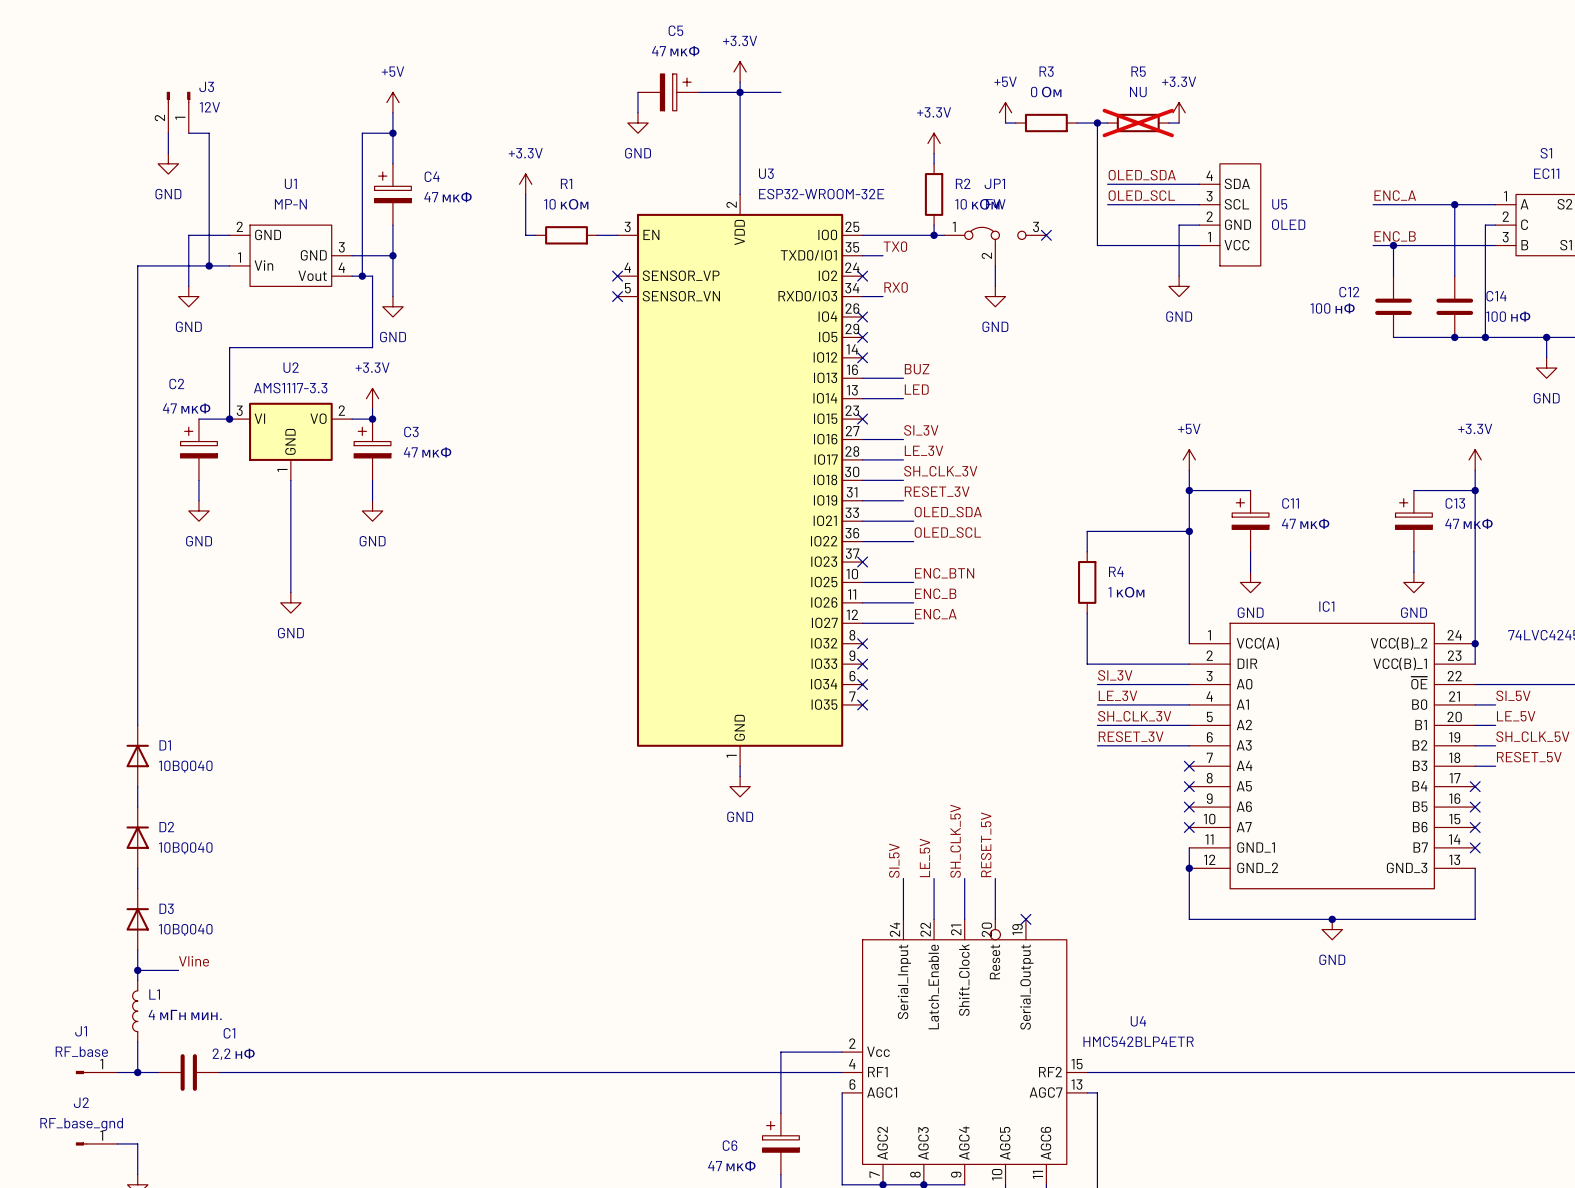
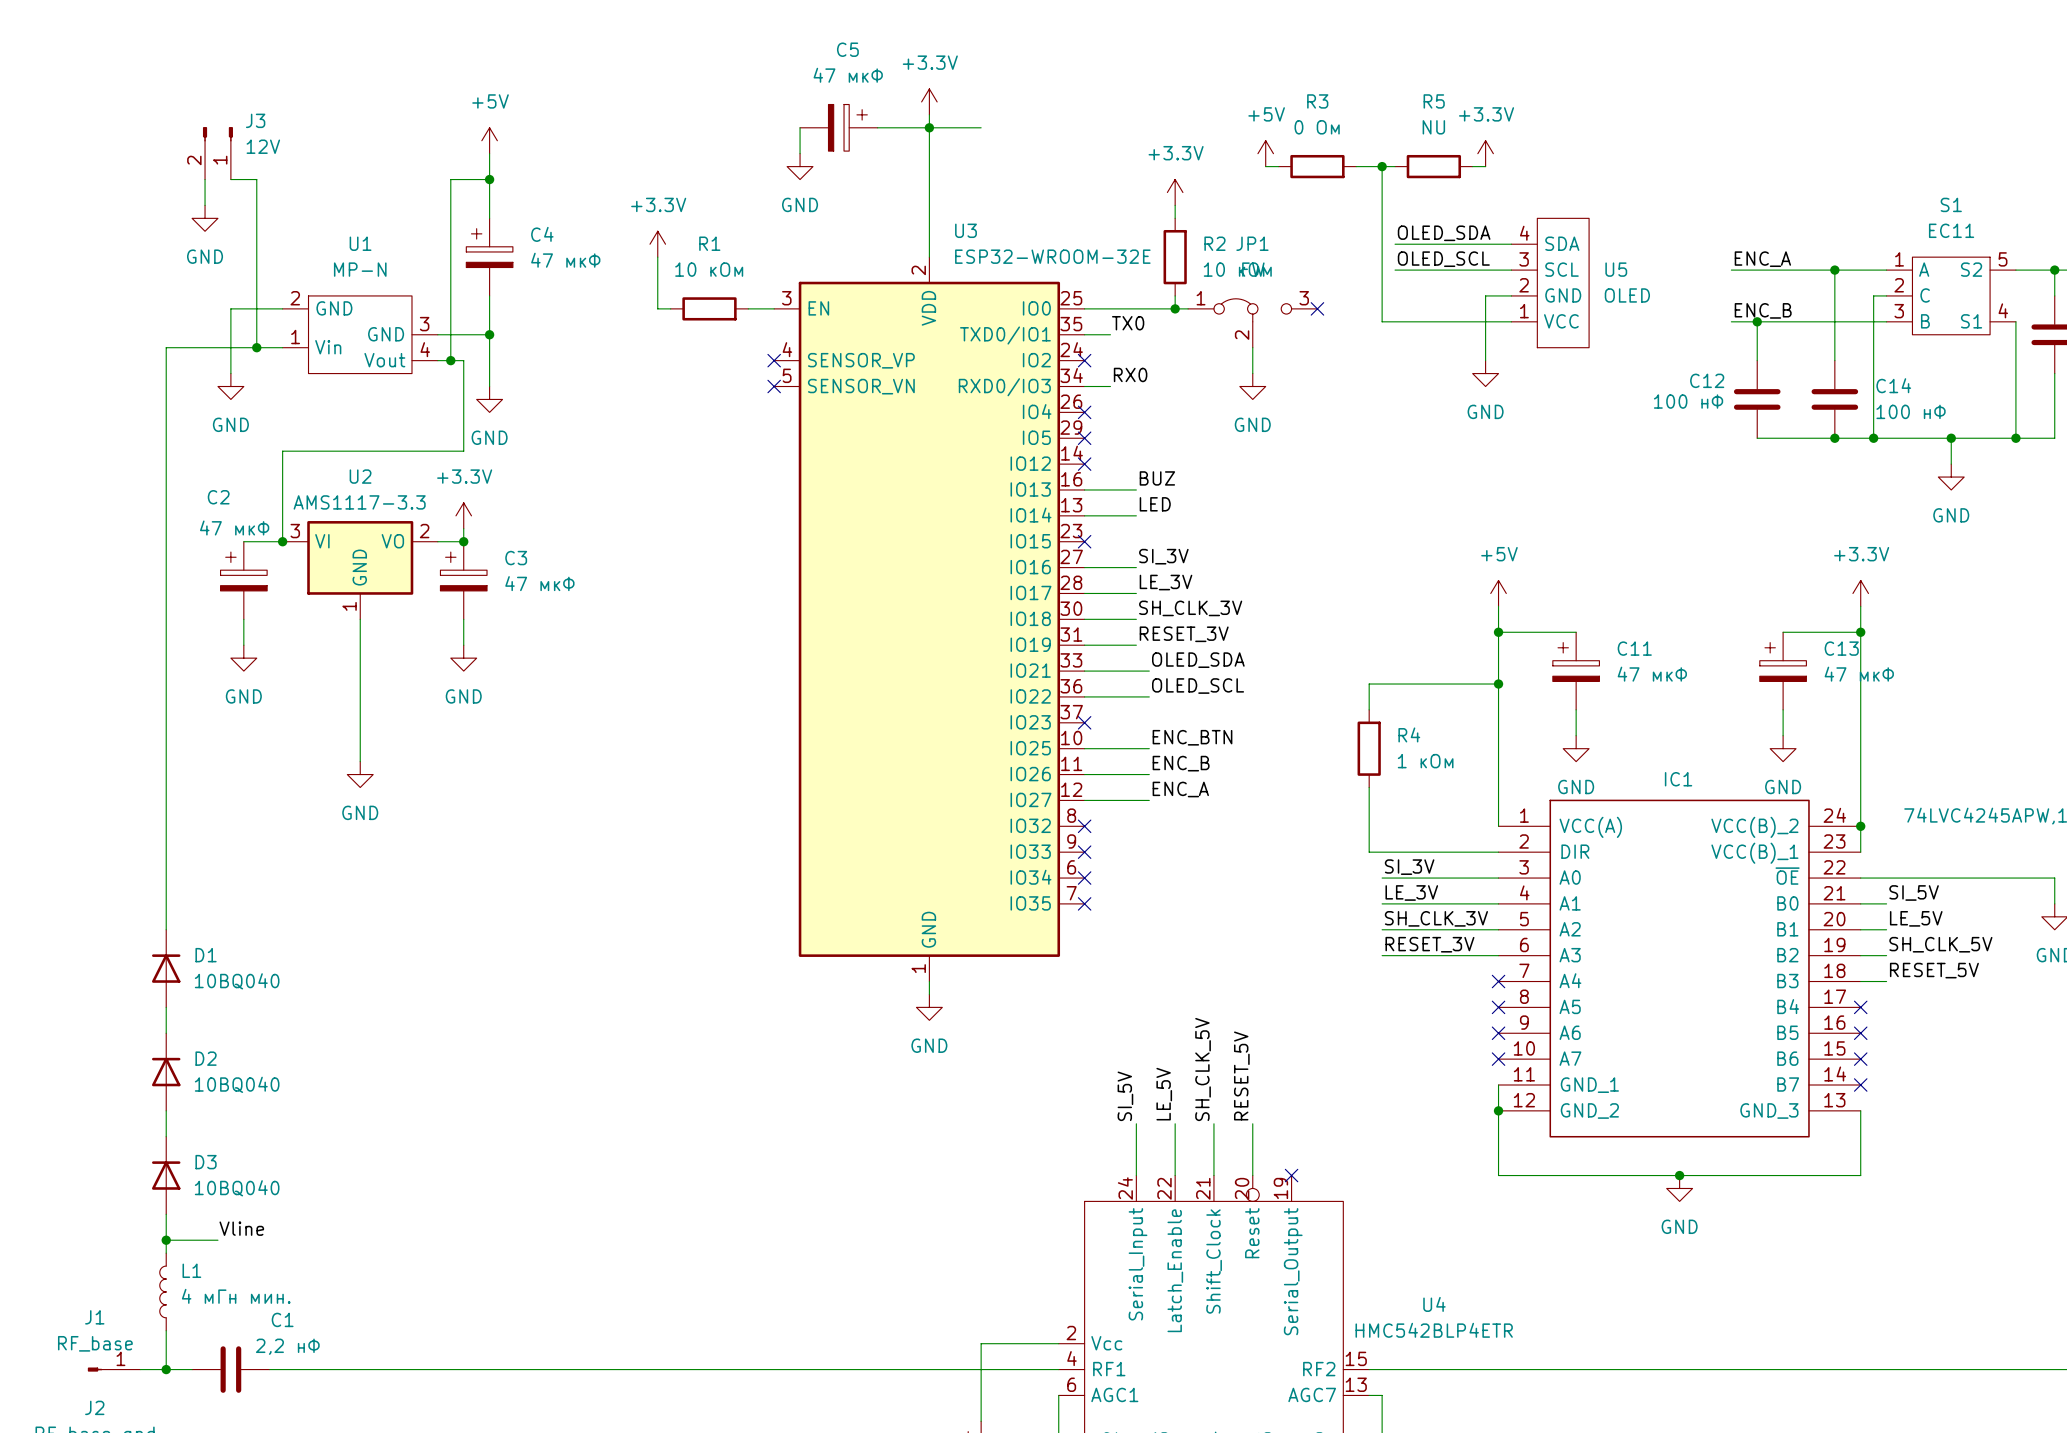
R5 do-not-place cross: (1138, 123) -> none

